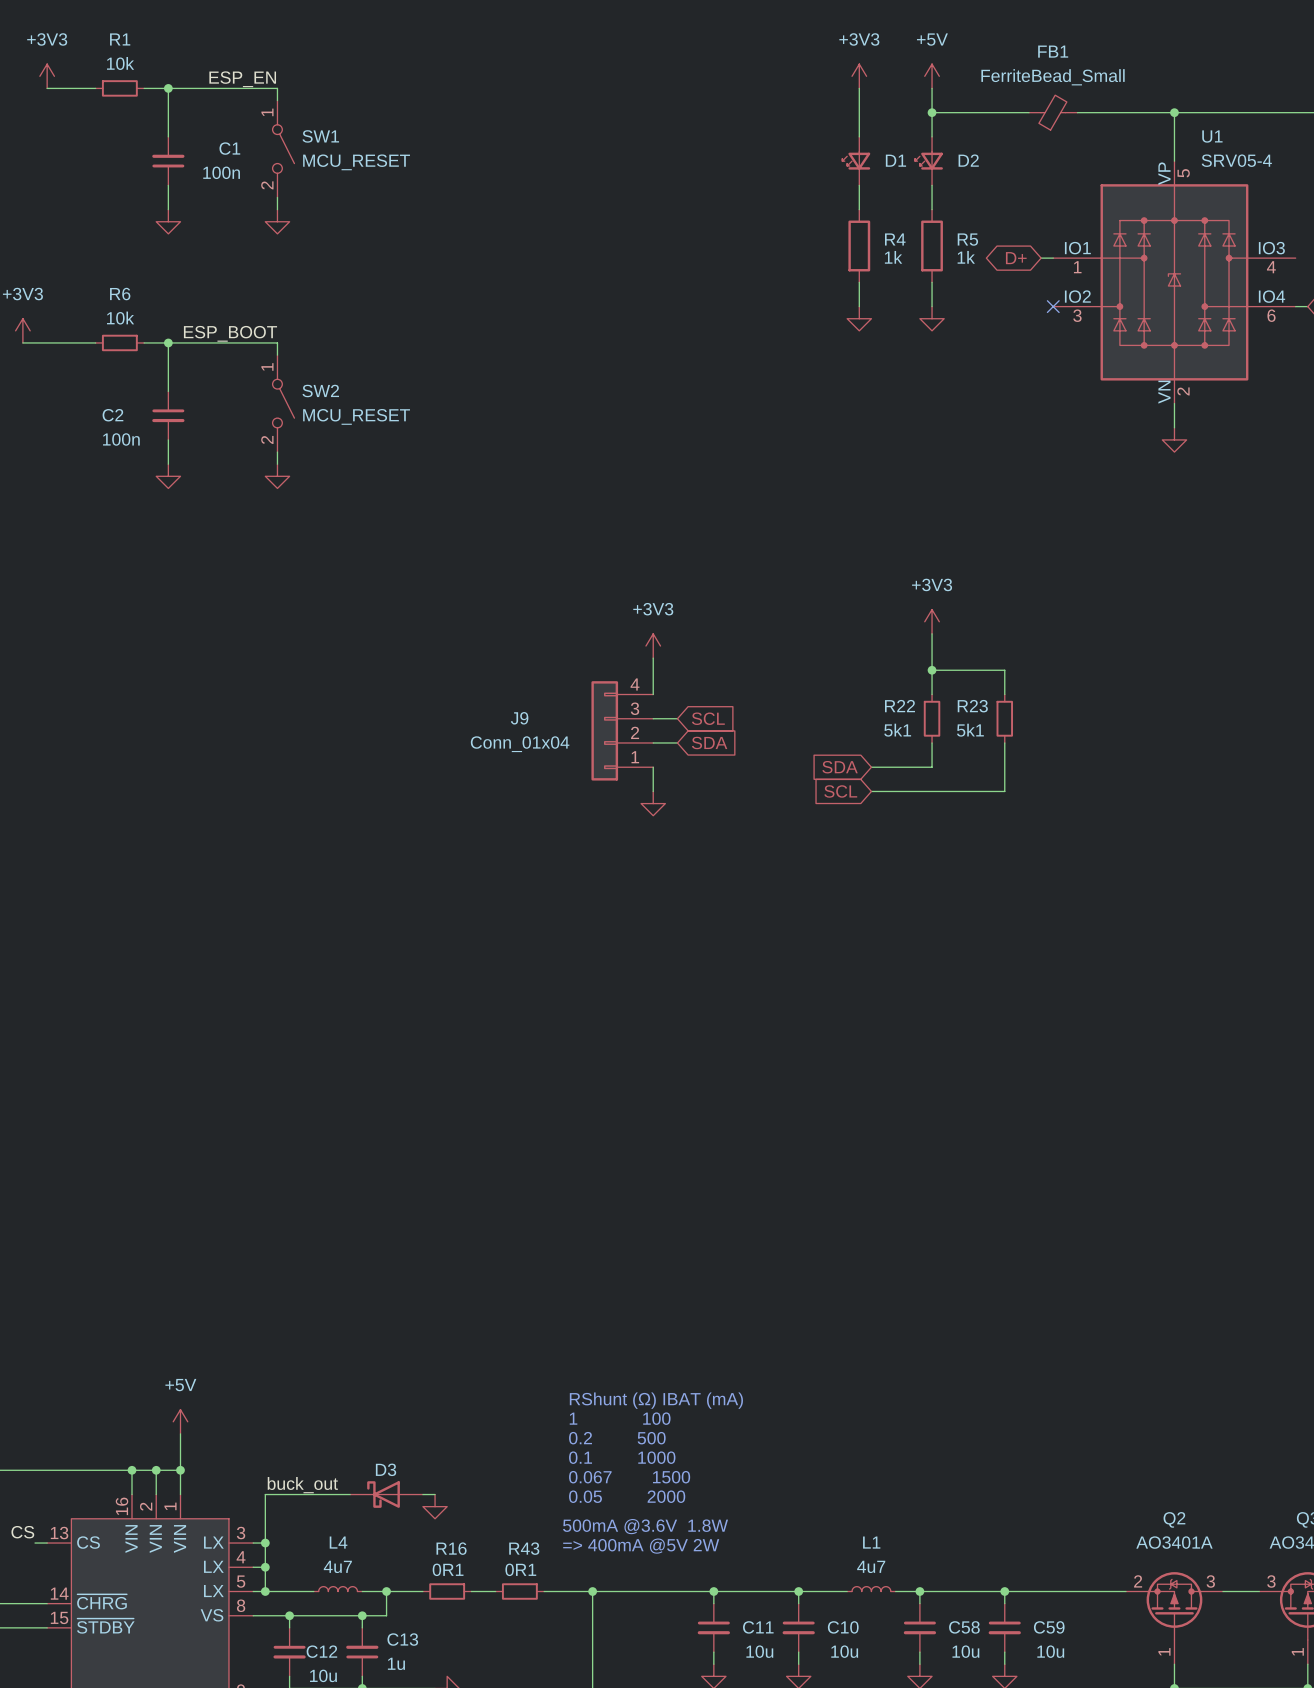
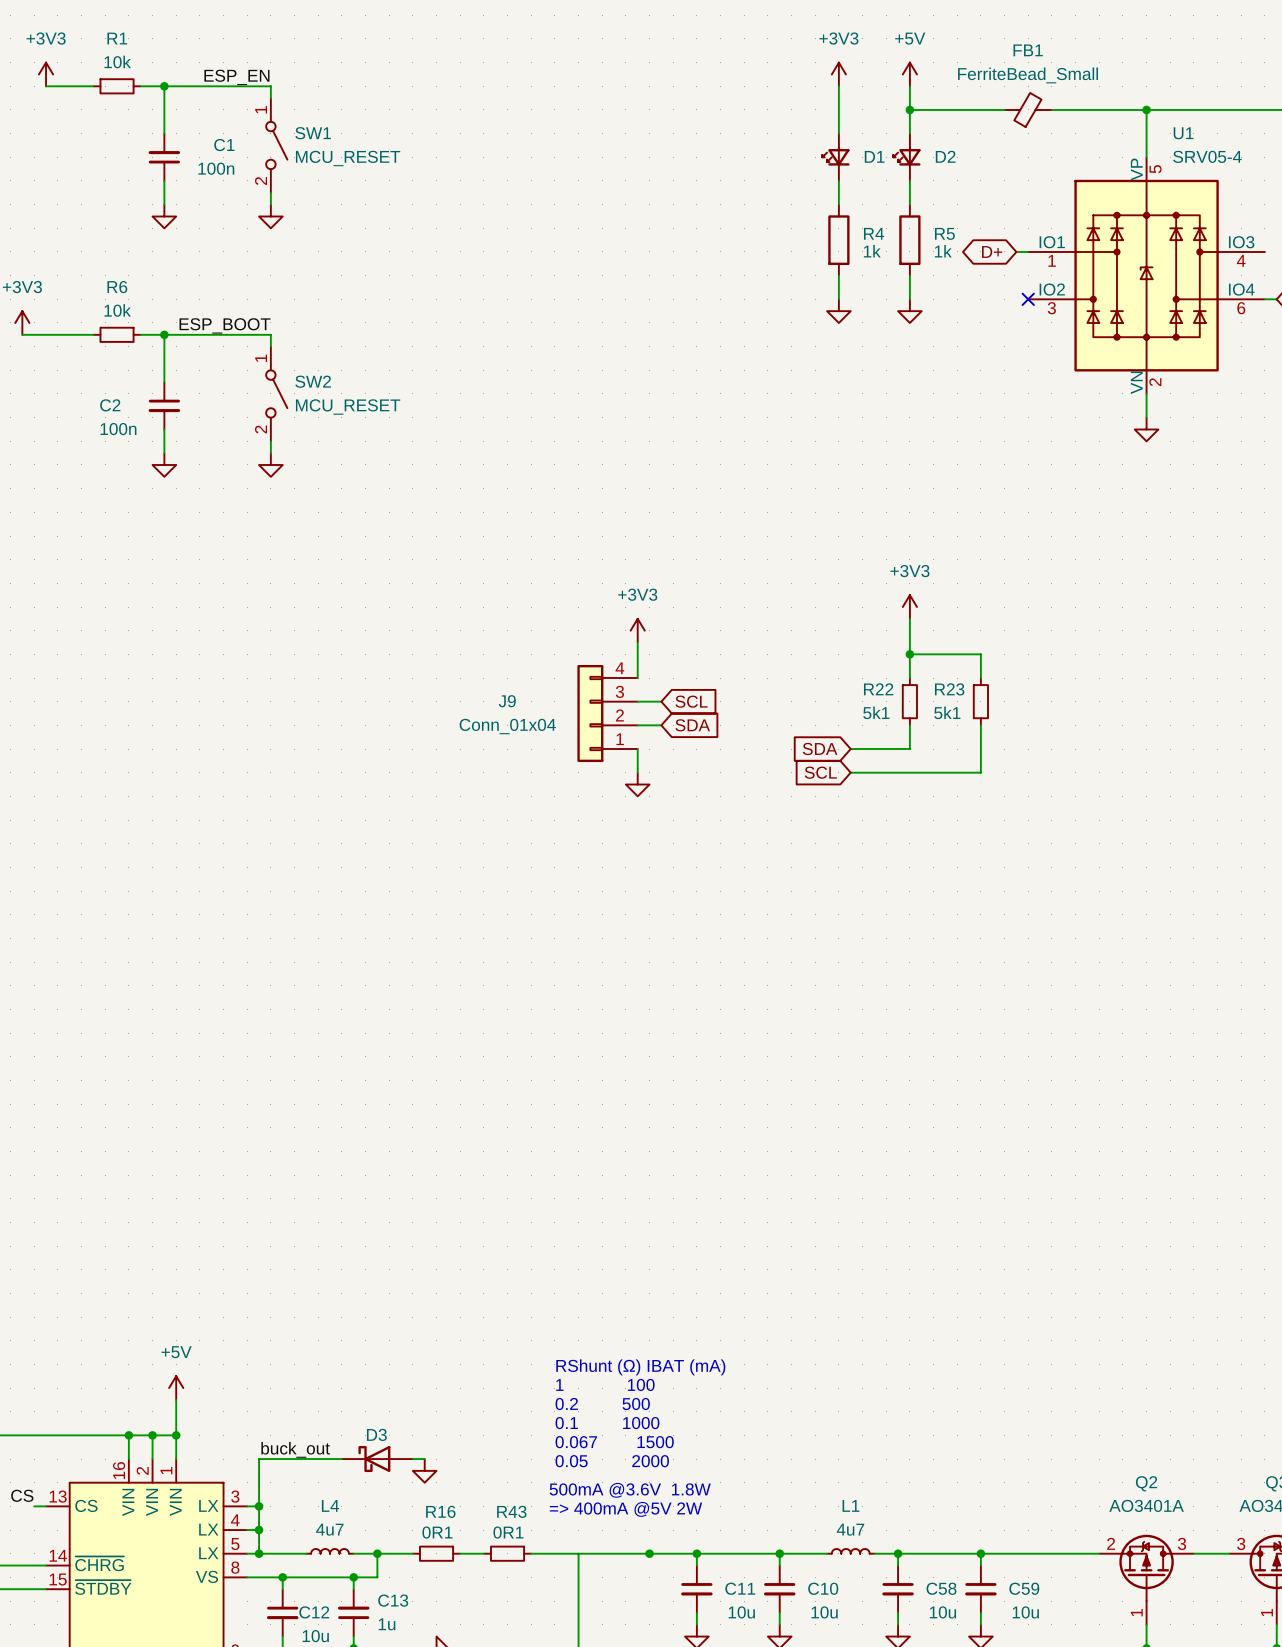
junction: (592, 1591) -> none
junction: none -> (649, 1553)

